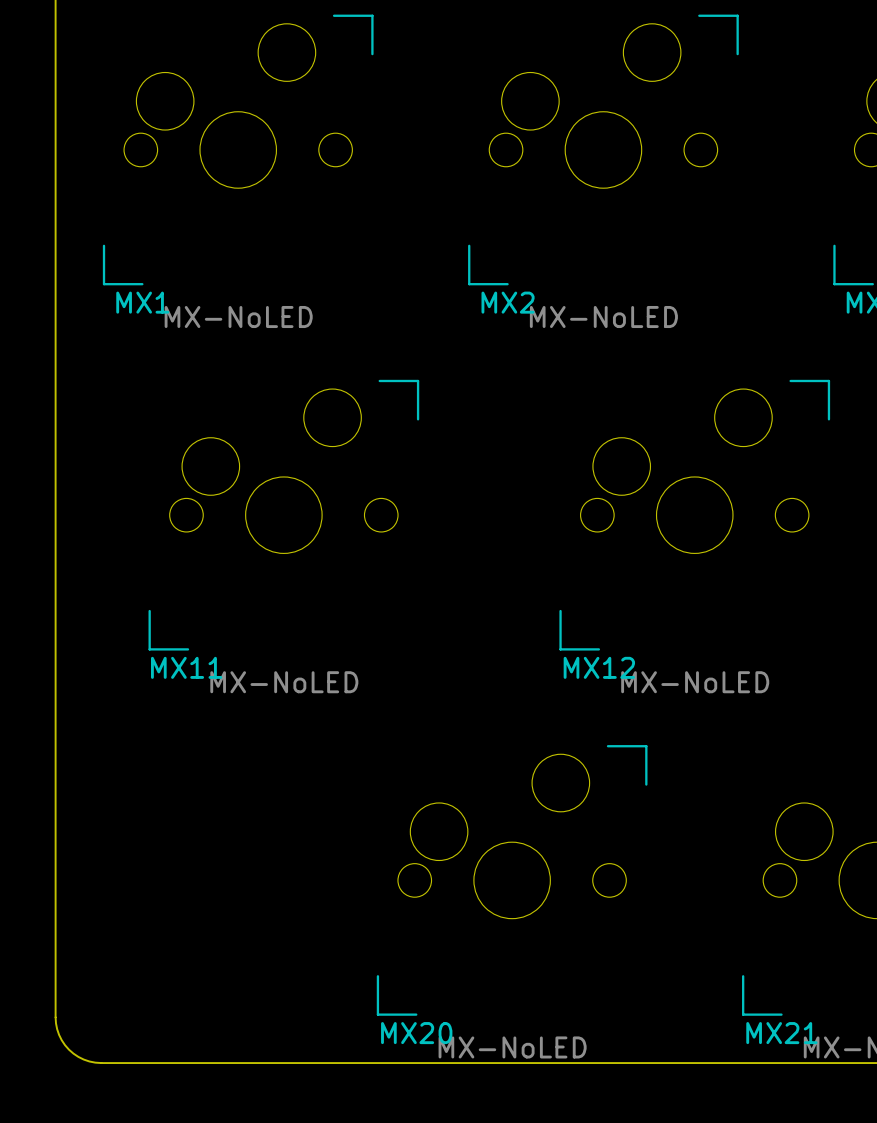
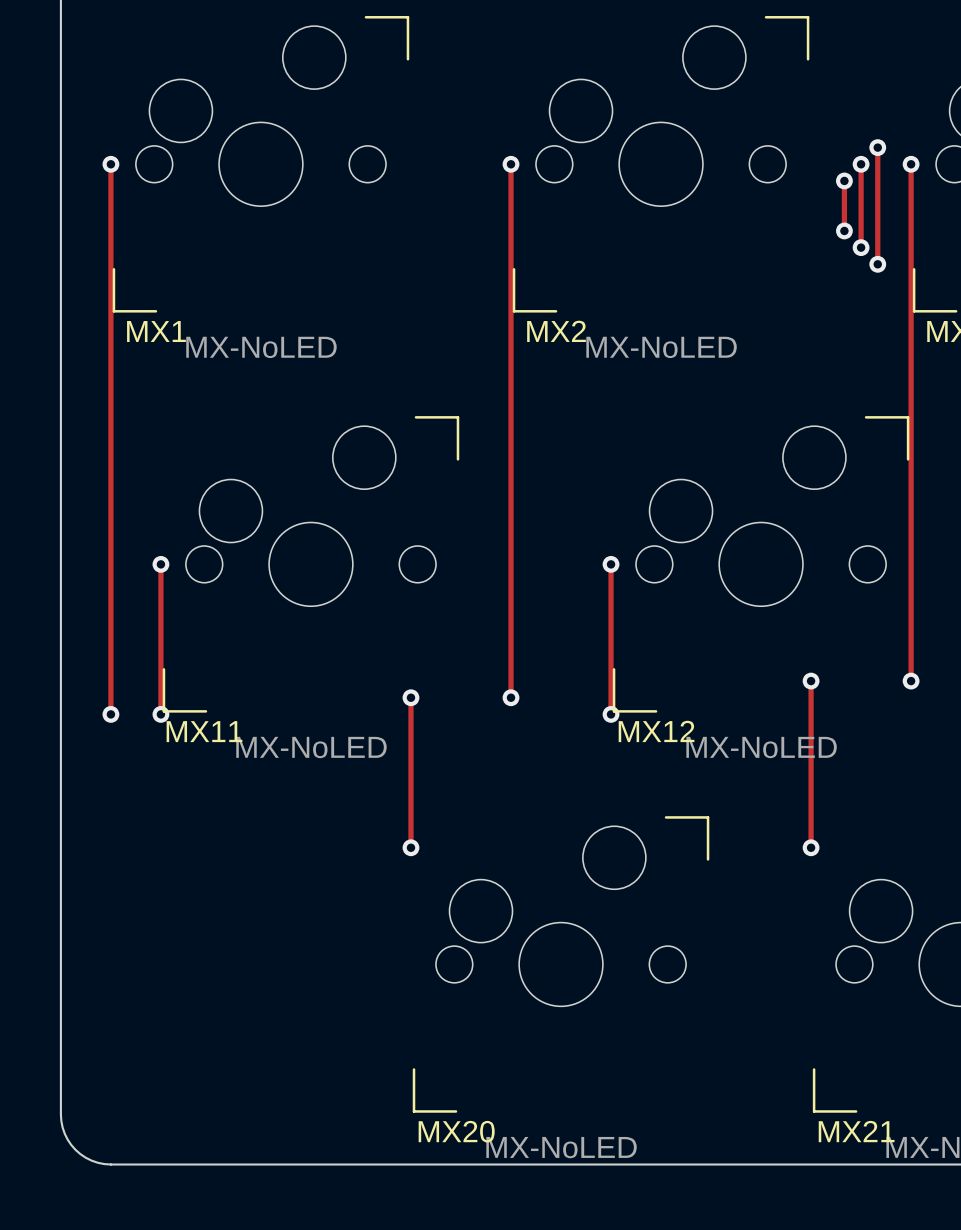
track: none -> (877, 147) (877, 264)
via: none -> (877, 147)
track: none -> (110, 164) (110, 714)
via: none -> (110, 164)
track: none -> (511, 164) (511, 697)
via: none -> (511, 164)
track: none -> (861, 164) (861, 247)
via: none -> (861, 164)
track: none -> (911, 164) (911, 681)
via: none -> (911, 164)
track: none -> (844, 180) (844, 230)
via: none -> (844, 180)
via: none -> (844, 230)
via: none -> (861, 247)
via: none -> (877, 264)
track: none -> (160, 564) (160, 714)
via: none -> (160, 564)
track: none -> (611, 564) (611, 714)
via: none -> (611, 564)
track: none -> (811, 681) (811, 847)
via: none -> (811, 681)
via: none -> (911, 681)
track: none -> (410, 697) (410, 847)
via: none -> (410, 697)
via: none -> (511, 697)
via: none -> (110, 714)
via: none -> (160, 714)
via: none -> (611, 714)
via: none -> (410, 847)
via: none -> (811, 847)

